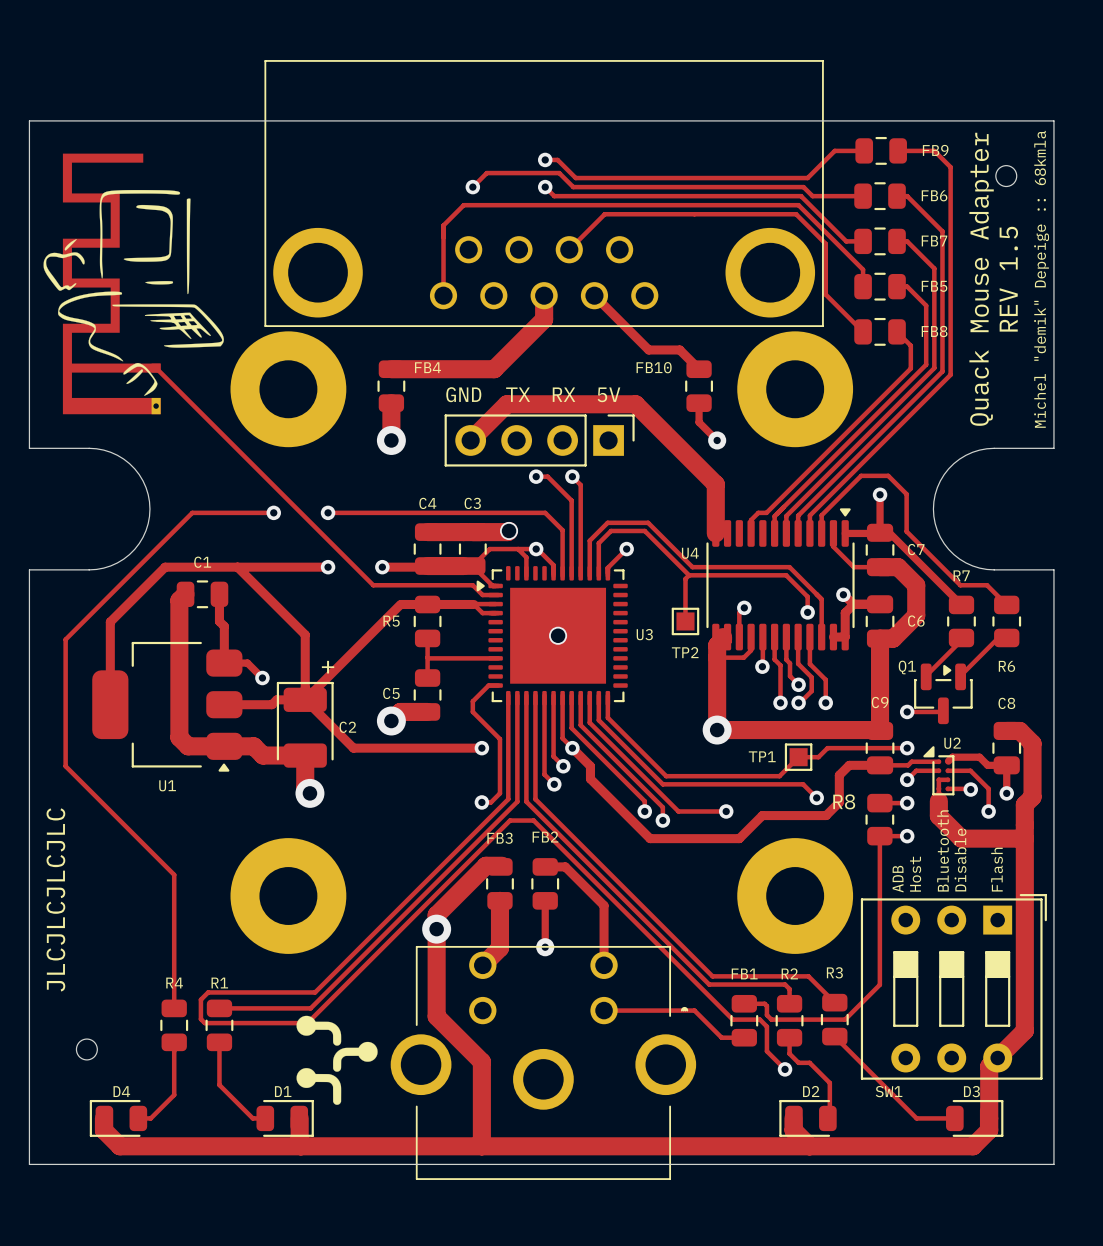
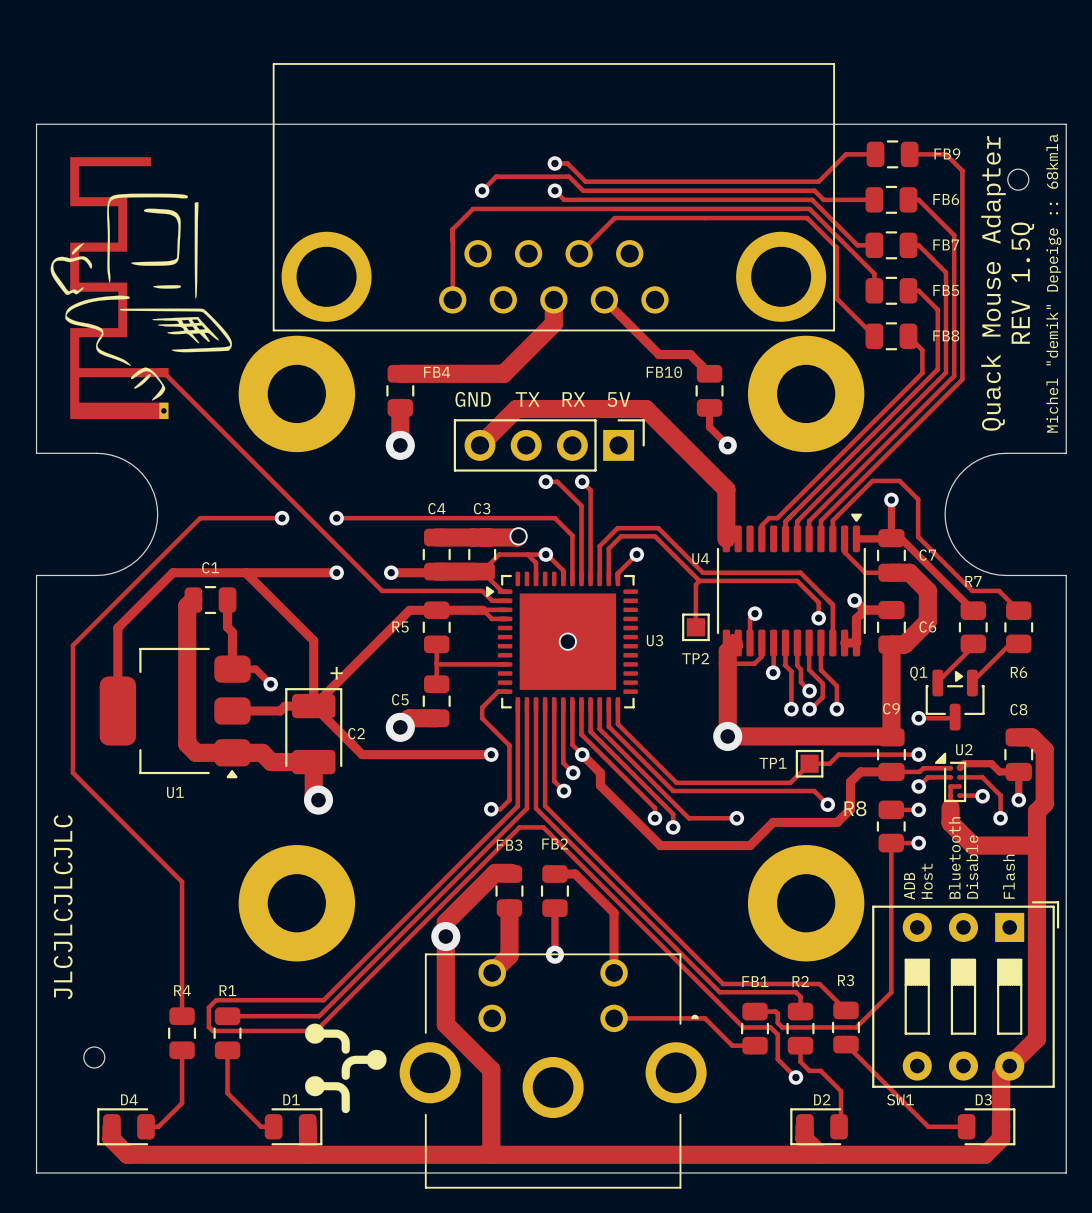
text: REV 1.5 (1008, 279) -> REV 1.5Q (1022, 283)

